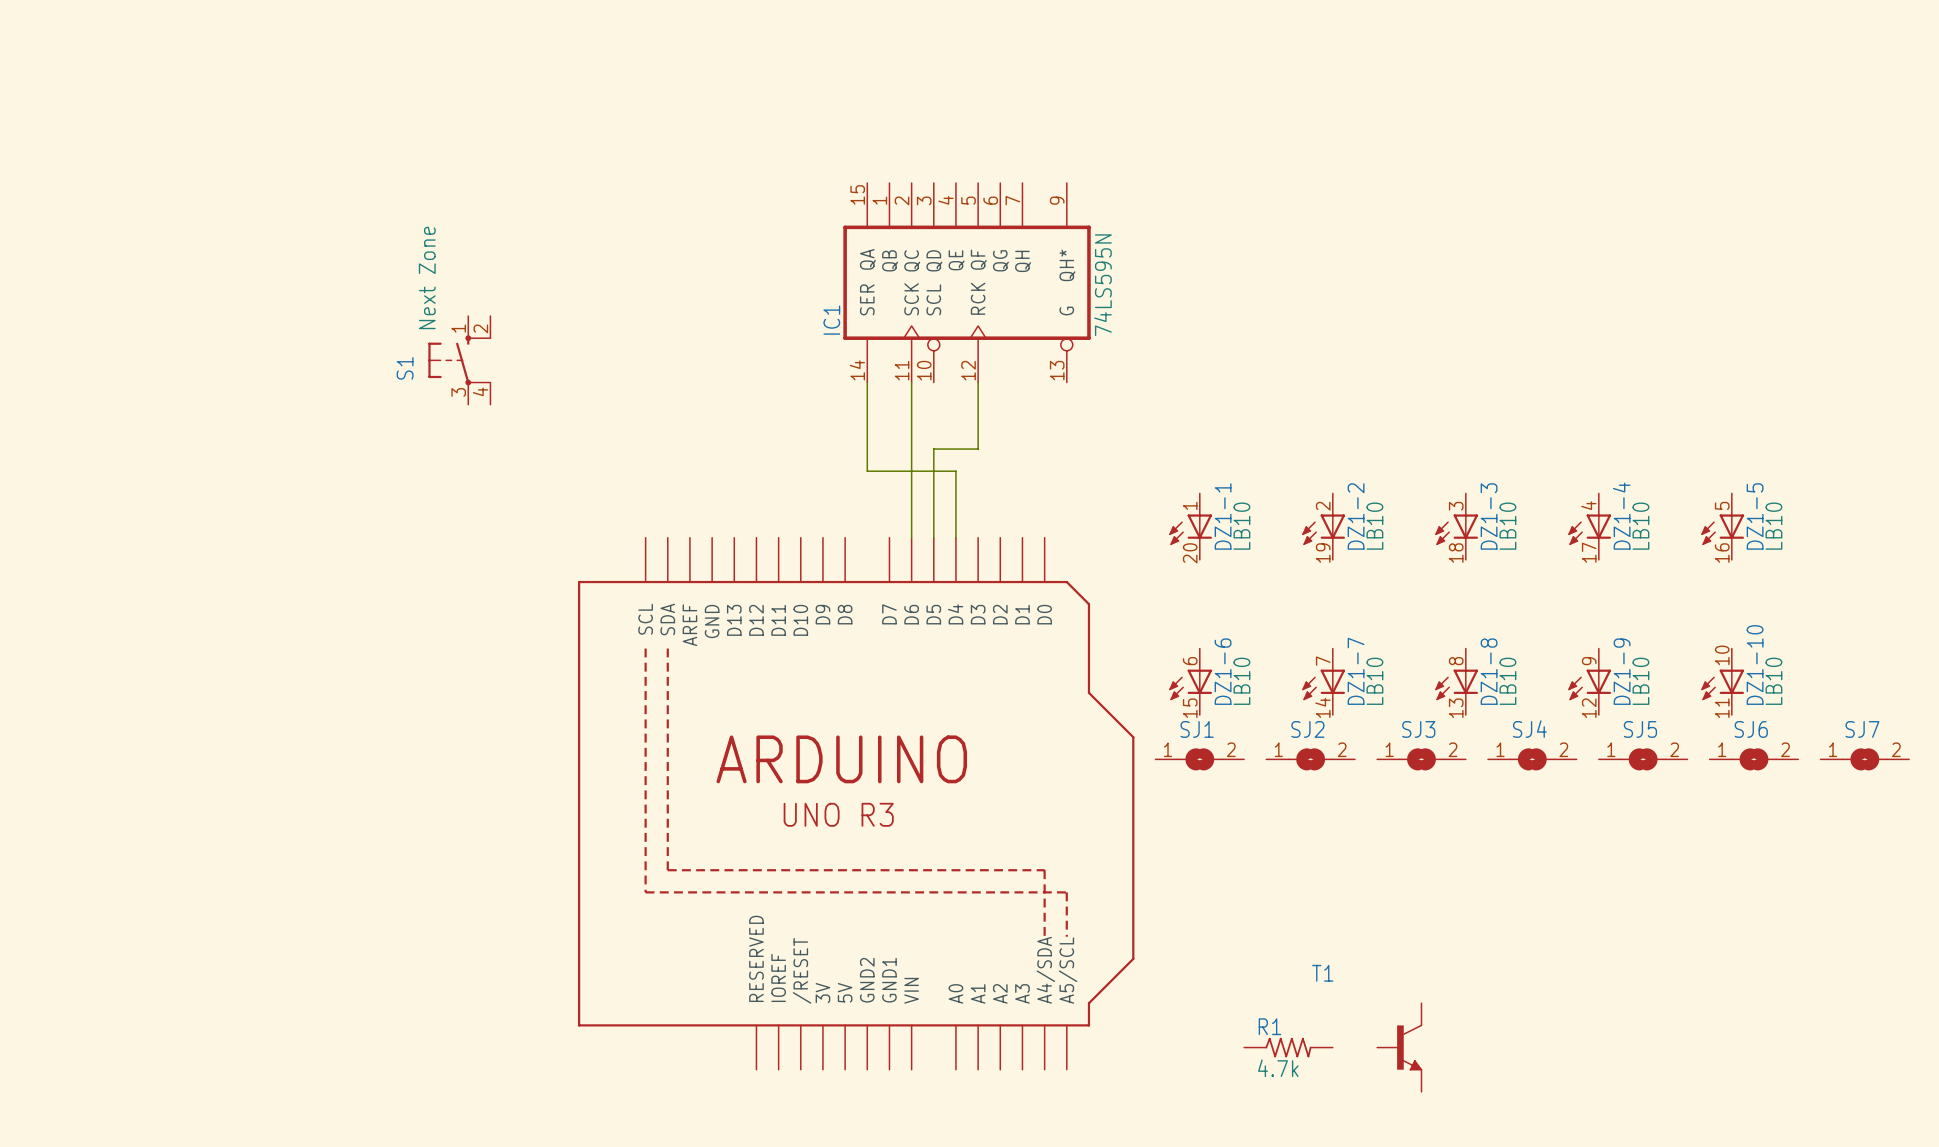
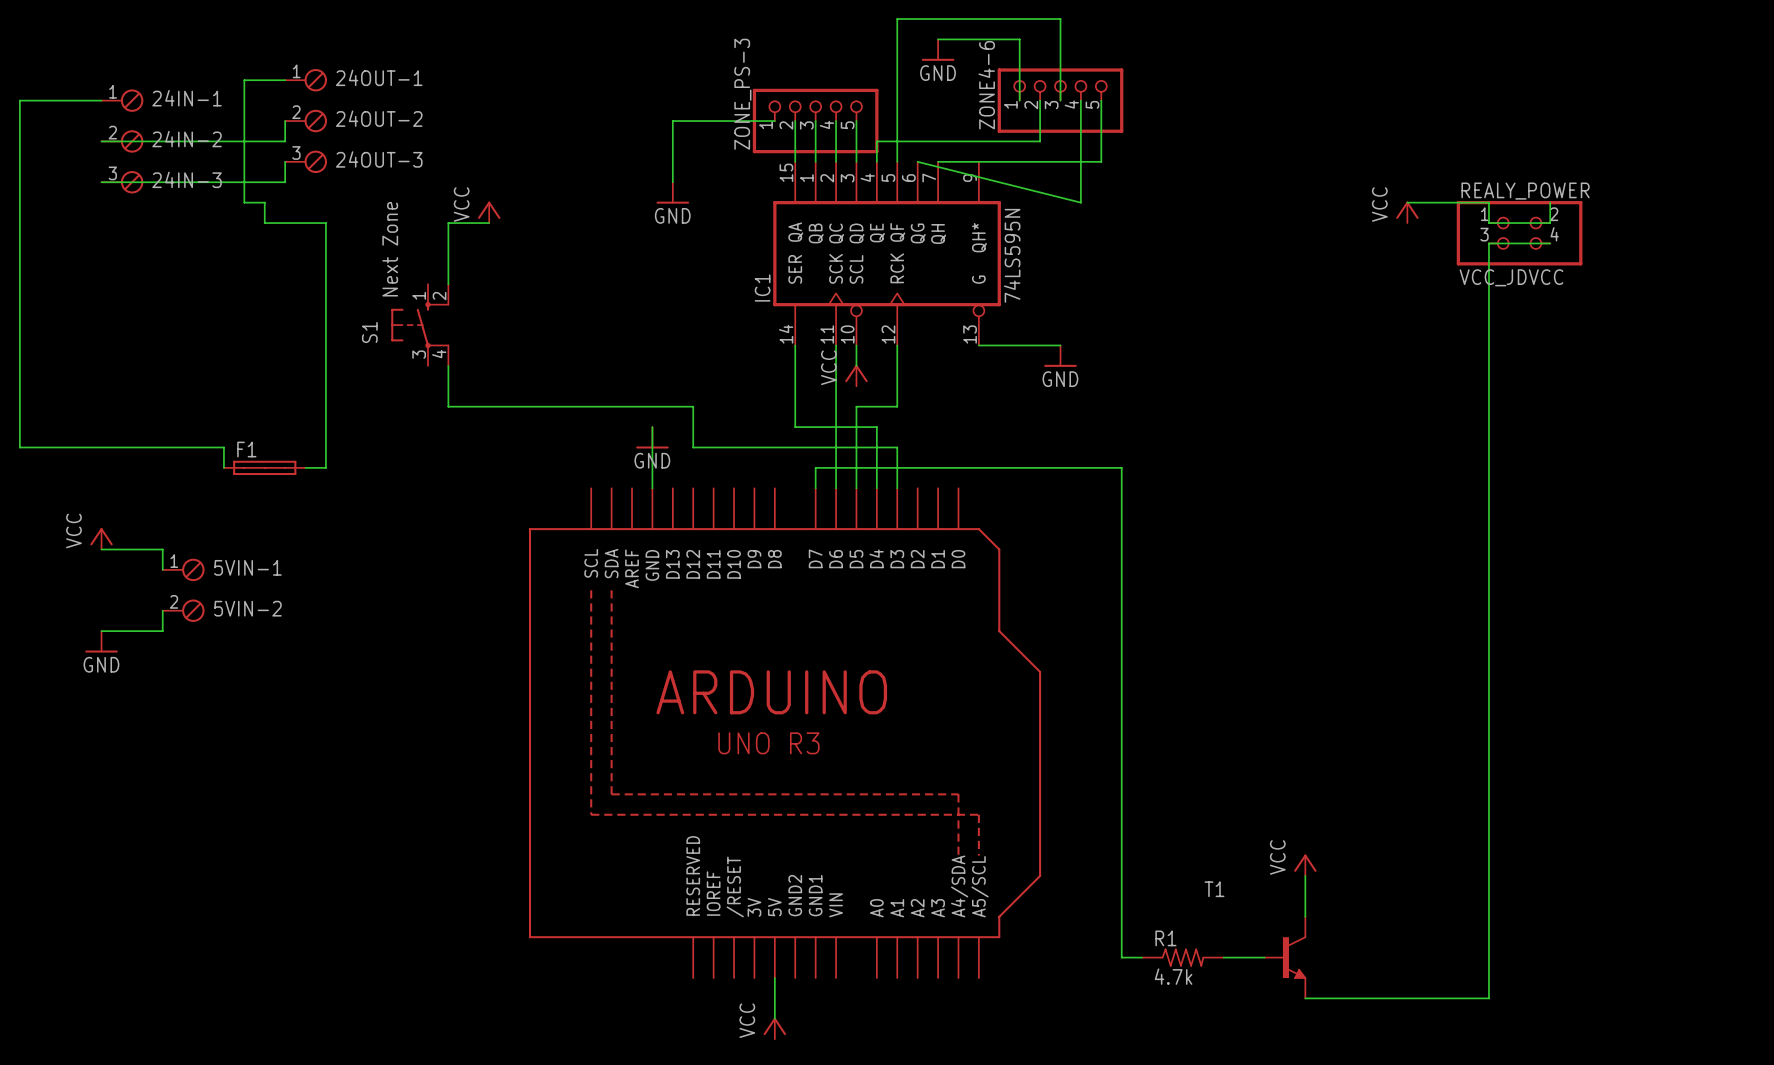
wire: none -> (938, 39) (1019, 39) (1019, 100)
power symbol: none -> GND (938, 50)
wire: none -> (285, 80) (244, 80) (244, 202) (264, 202) (264, 223) (325, 223) (325, 467) (305, 467)
24OUT-1: none -> (306, 80)
wire: none -> (101, 100) (19, 100) (19, 447) (223, 447) (223, 467)
24IN-1: none -> (122, 100)
wire: none -> (1040, 100) (1040, 141) (876, 141) (876, 161)
wire: none -> (1060, 100) (1060, 19) (897, 19) (897, 161)
ZONE4-6: none -> (1060, 100)
wire: none -> (1080, 100) (1080, 202) (917, 161)
wire: none -> (1101, 100) (1101, 161) (938, 161)
wire: none -> (285, 121) (285, 141) (101, 141)
24OUT-2: none -> (306, 121)
wire: none -> (774, 121) (672, 121) (672, 182)
wire: none -> (795, 121) (795, 161)
wire: none -> (815, 121) (815, 161)
ZONE_PS-3: none -> (815, 121)
wire: none -> (836, 121) (836, 161)
wire: none -> (856, 121) (856, 161)
24IN-2: none -> (122, 141)
wire: none -> (285, 161) (285, 182) (101, 182)
24OUT-3: none -> (306, 161)
24IN-3: none -> (122, 182)
power symbol: none -> GND (672, 192)
wire: none -> (1407, 202) (1488, 202) (1488, 223) (1550, 223) (1550, 202)
power symbol: none -> VCC (489, 212)
power symbol: none -> VCC (1407, 212)
wire: none -> (489, 223) (448, 223) (448, 284)
REALY_POWER: none -> VCC_JDVCC (1519, 233)
wire: none -> (1550, 243) (1488, 243) (1488, 998) (1305, 998)
wire: none -> (856, 345) (856, 365)
wire: none -> (978, 345) (1060, 345)
power symbol: none -> GND (1060, 356)
wire: none -> (448, 365) (448, 406) (693, 406) (693, 447) (897, 447) (897, 488)
power symbol: none -> VCC (856, 375)
wire: none -> (652, 427) (652, 488)
power symbol: none -> GND (652, 437)
F1: none -> (264, 467)
DZ1-1: LB10 (1190, 526) -> none
DZ1-2: LB10 (1323, 526) -> none
DZ1-3: LB10 (1456, 526) -> none
DZ1-4: LB10 (1589, 526) -> none
DZ1-5: LB10 (1722, 526) -> none
wire: none -> (815, 488) (815, 467) (1121, 467) (1121, 957) (1142, 957)
power symbol: none -> VCC (101, 538)
wire: none -> (101, 549) (162, 549) (162, 569)
5VIN-1: none -> (183, 569)
wire: none -> (162, 610) (162, 631) (101, 631)
5VIN-2: none -> (183, 610)
DZ1-6: LB10 (1190, 681) -> none
DZ1-7: LB10 (1323, 681) -> none
DZ1-8: LB10 (1456, 681) -> none
DZ1-9: LB10 (1589, 681) -> none
DZ1-10: LB10 (1722, 681) -> none
power symbol: none -> GND (101, 641)
SJ1: (1199, 759) -> none
SJ2: (1310, 759) -> none
SJ3: (1421, 759) -> none
SJ4: (1532, 759) -> none
SJ5: (1643, 759) -> none
SJ6: (1753, 759) -> none
SJ7: (1864, 759) -> none
power symbol: none -> VCC (1305, 865)
wire: none -> (1305, 875) (1305, 916)
wire: none -> (1223, 957) (1264, 957)
wire: none -> (774, 977) (774, 1018)
power symbol: none -> VCC (774, 1028)

